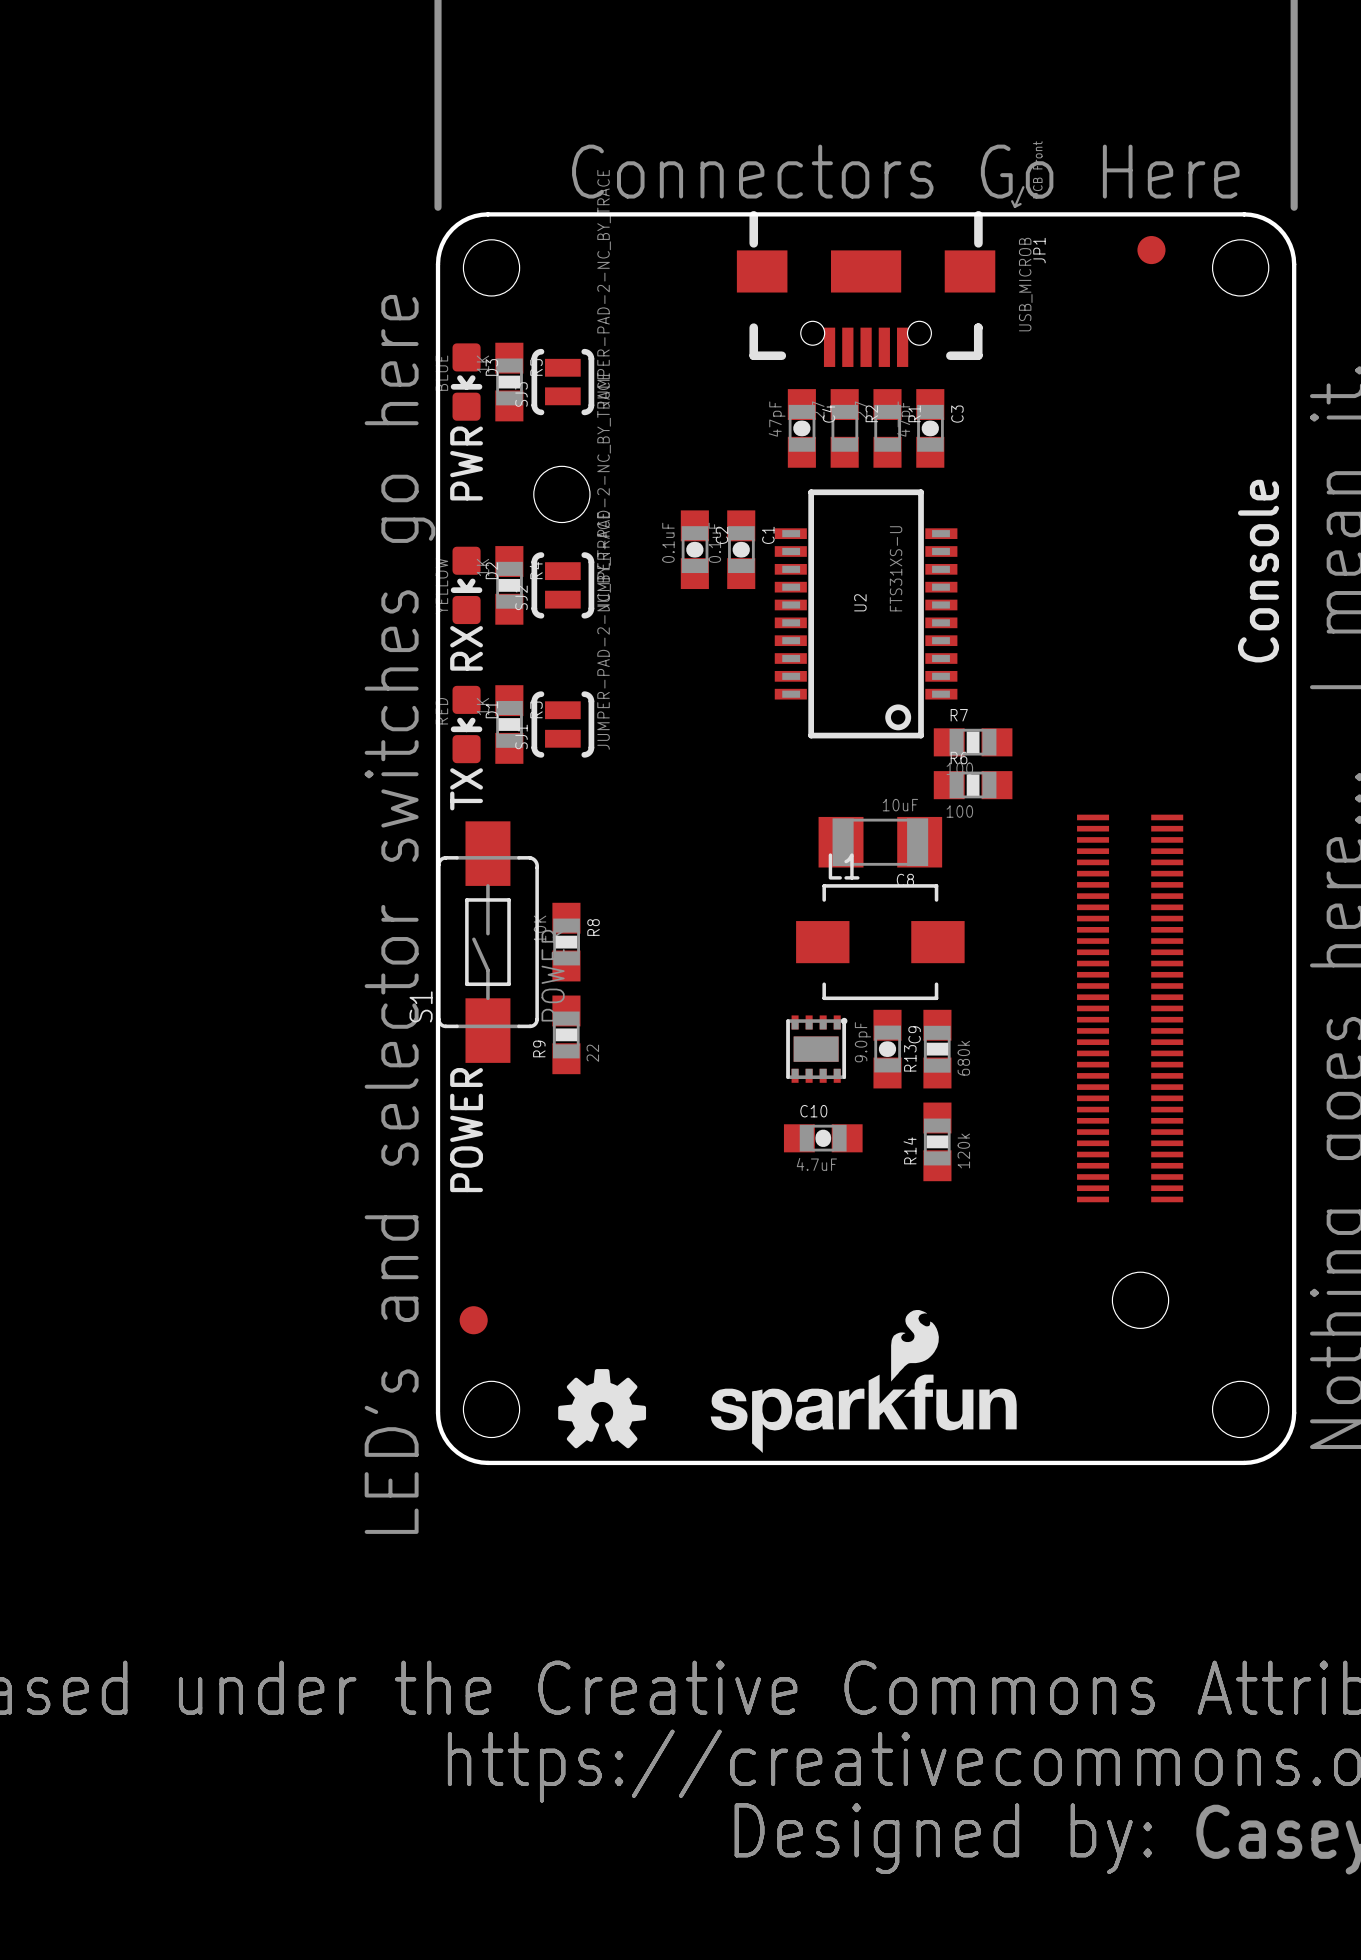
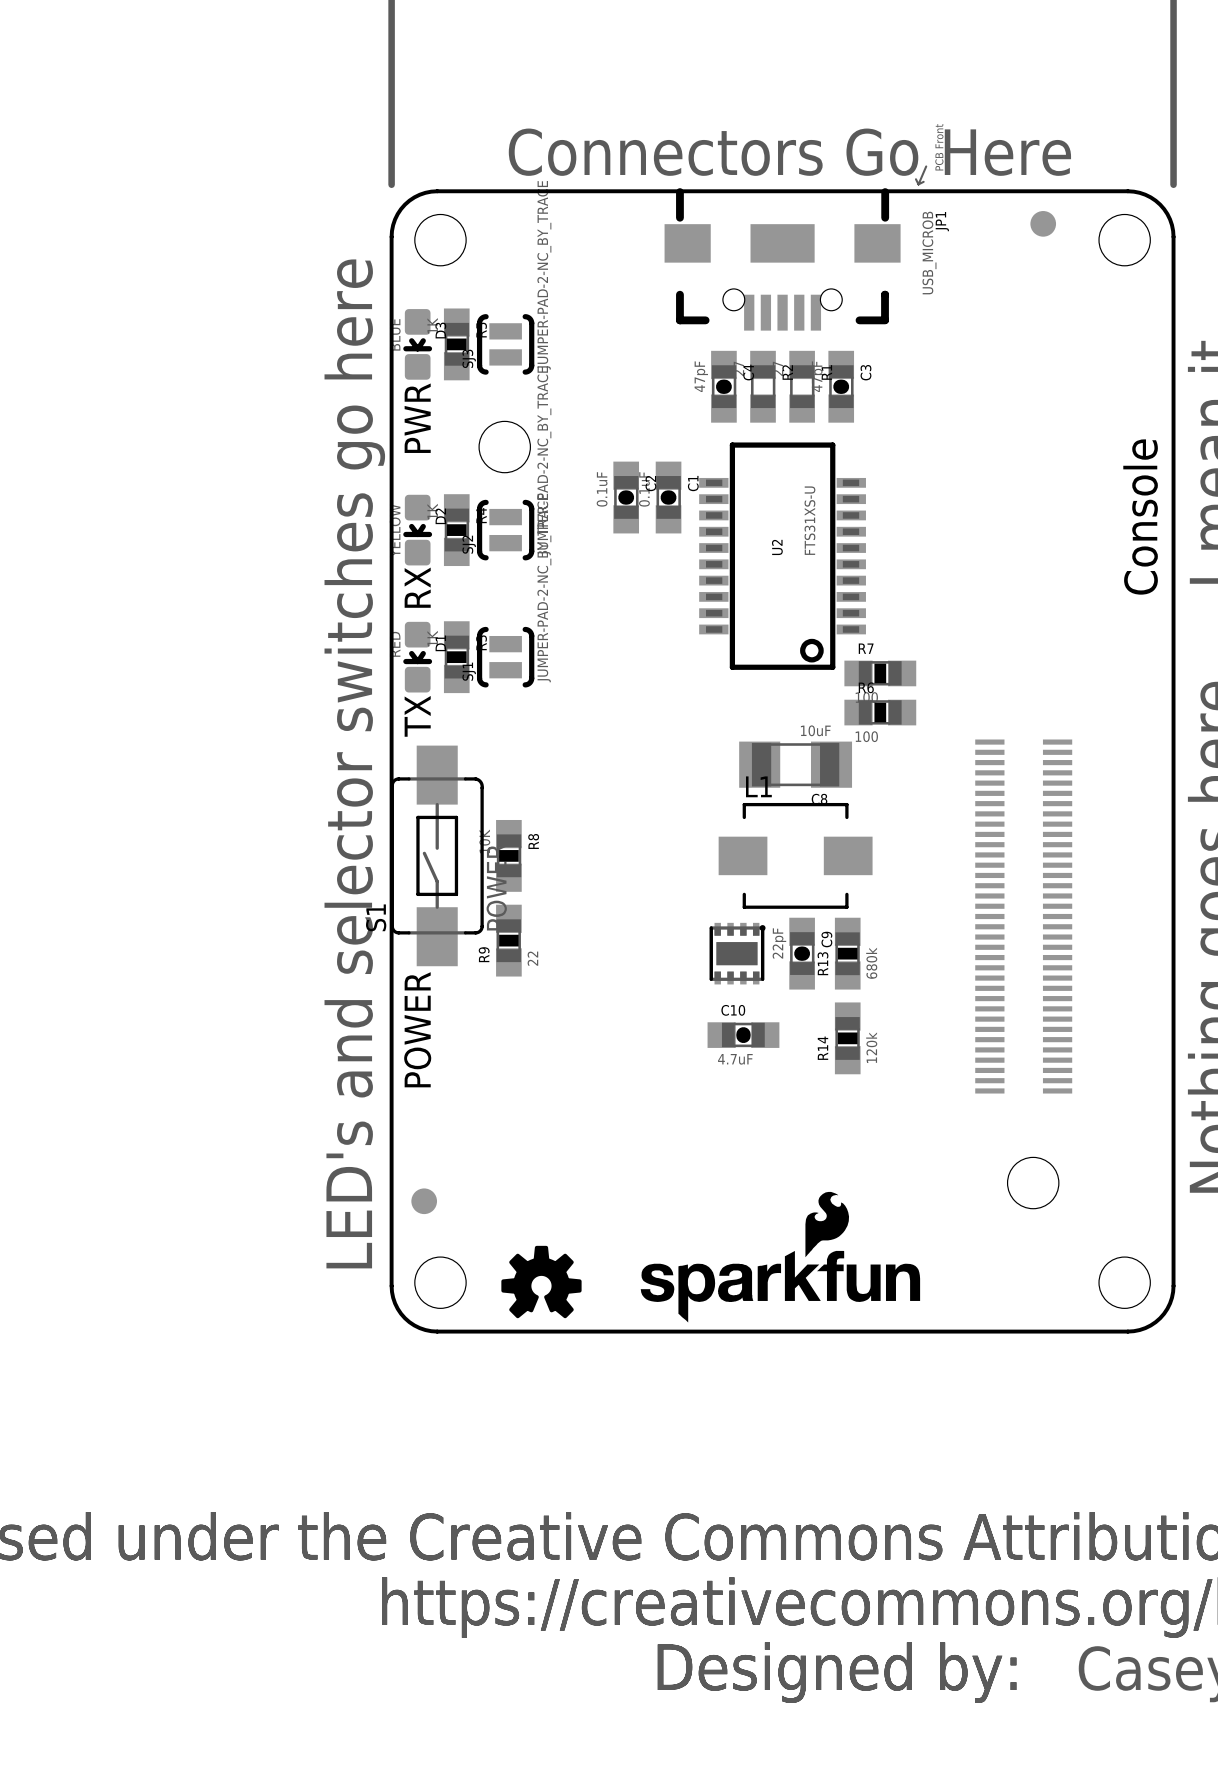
C9 value: 9.0pF (862, 1042) -> 22pF (779, 943)

